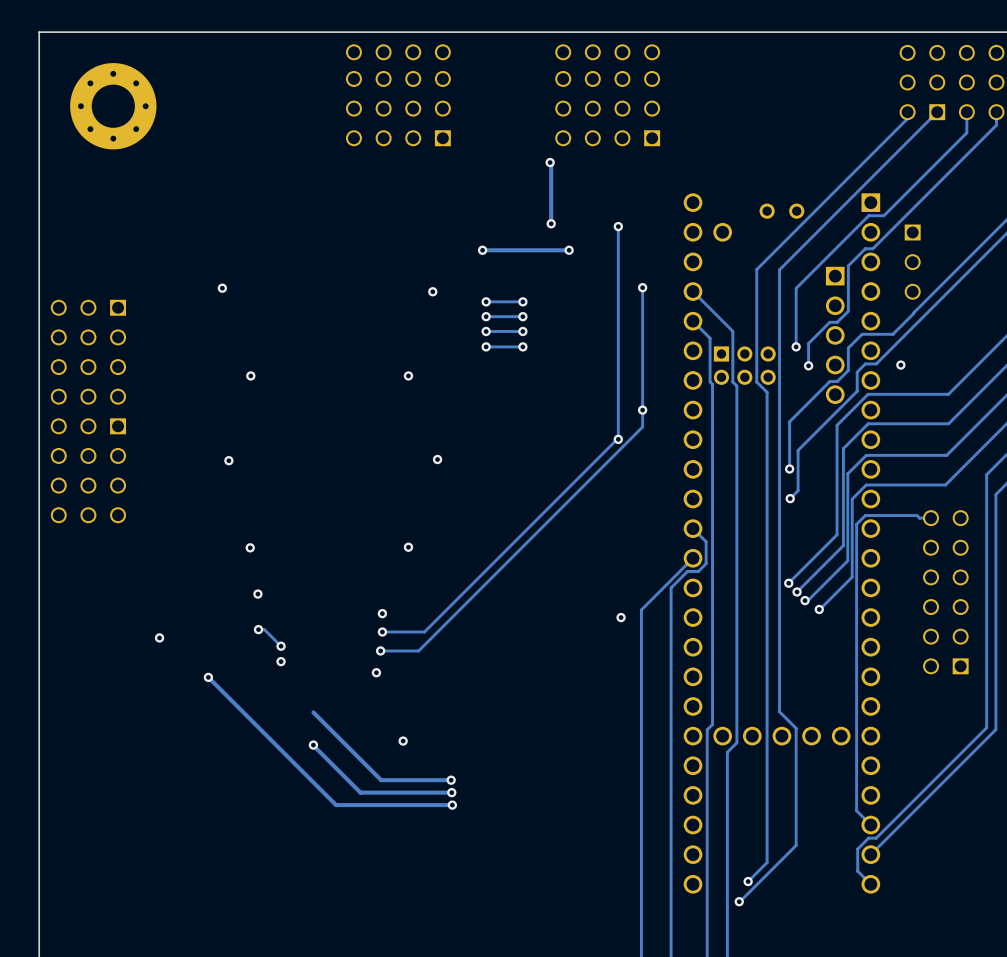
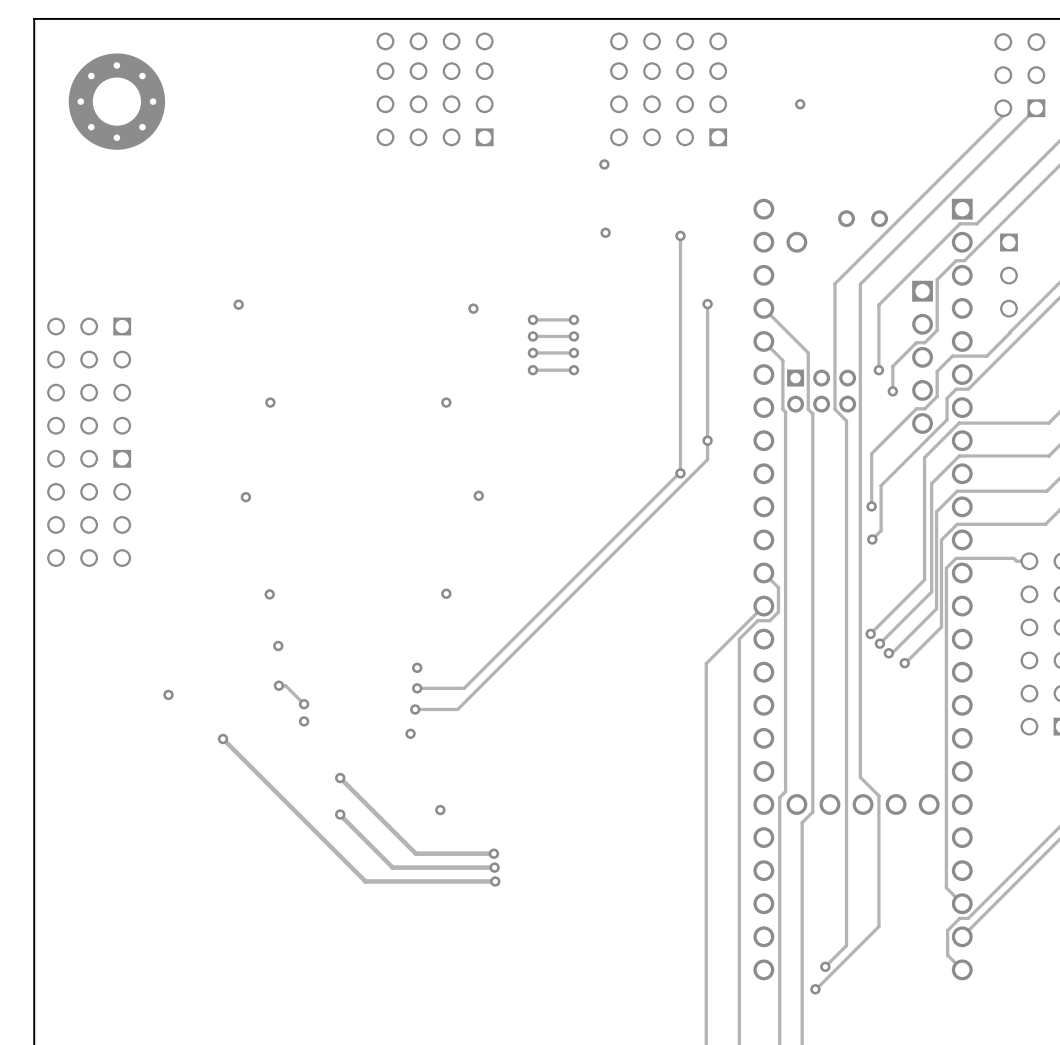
via: none -> (800, 104)
track: (551, 163) (551, 223) -> none
via: (482, 250) -> none
track: (569, 250) (482, 250) -> none
via: (569, 250) -> none
via: (900, 365) -> none
via: (621, 617) -> none
via: none -> (340, 778)

